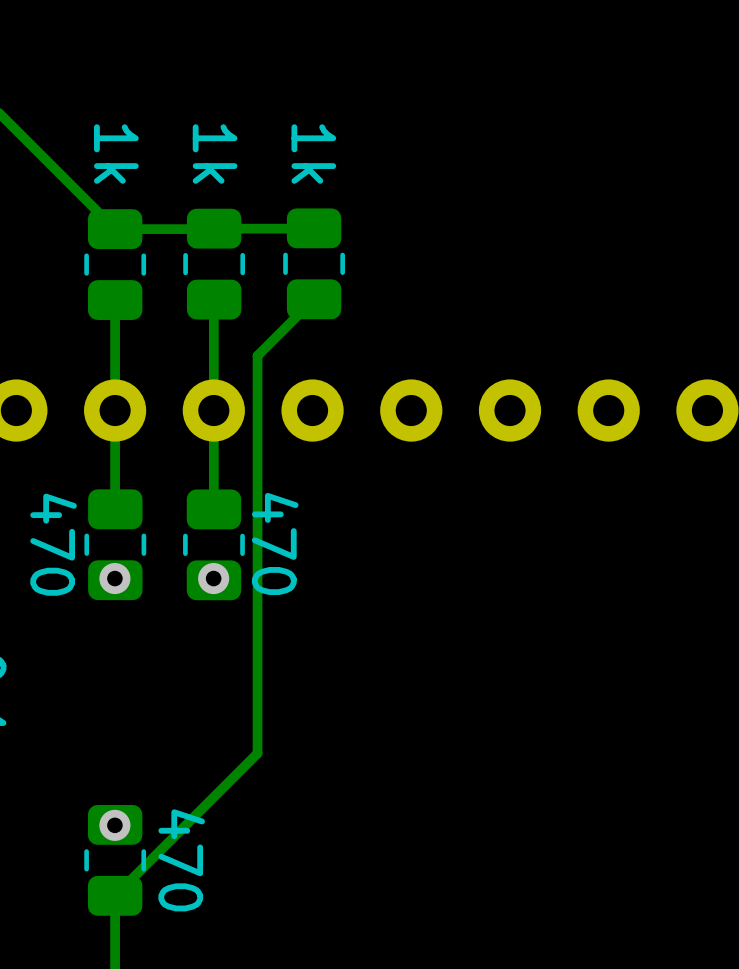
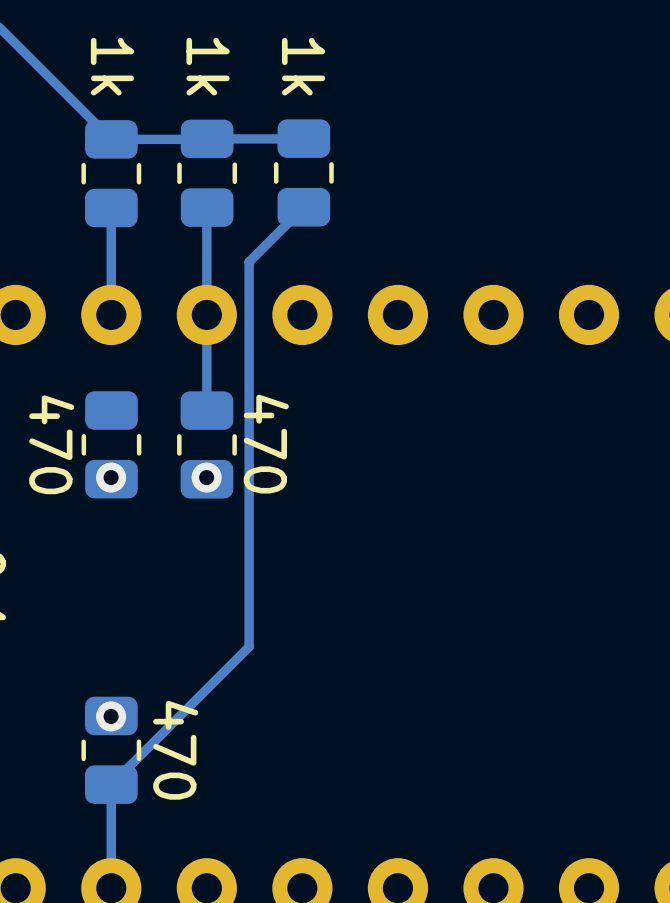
bottom track: (115, 410) (115, 509) -> none

